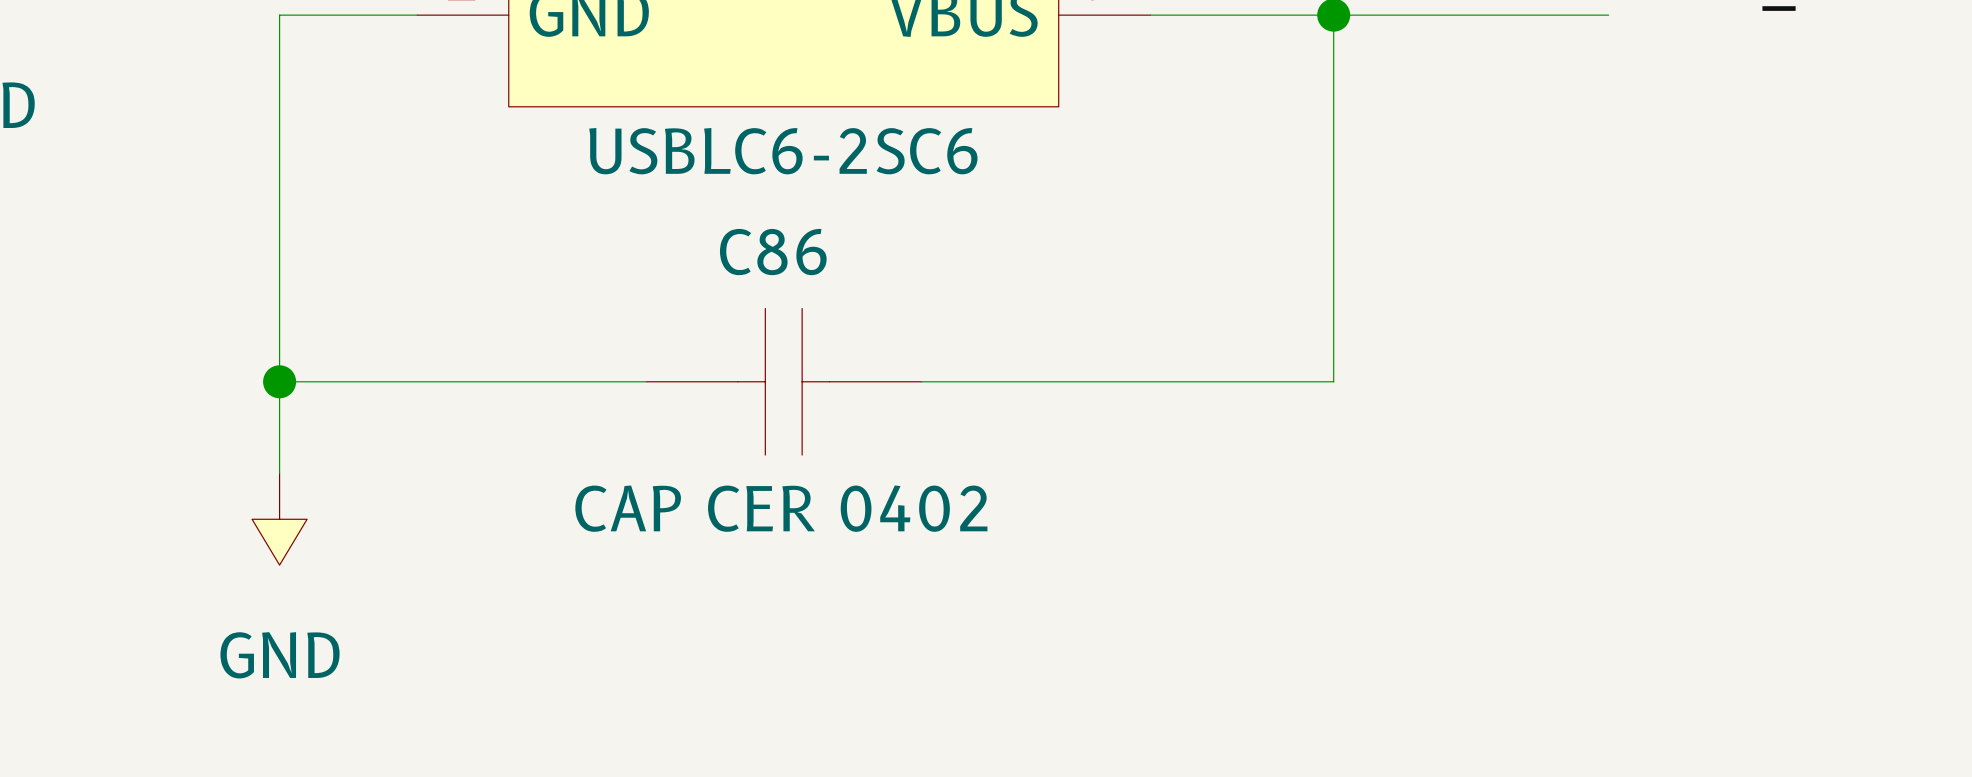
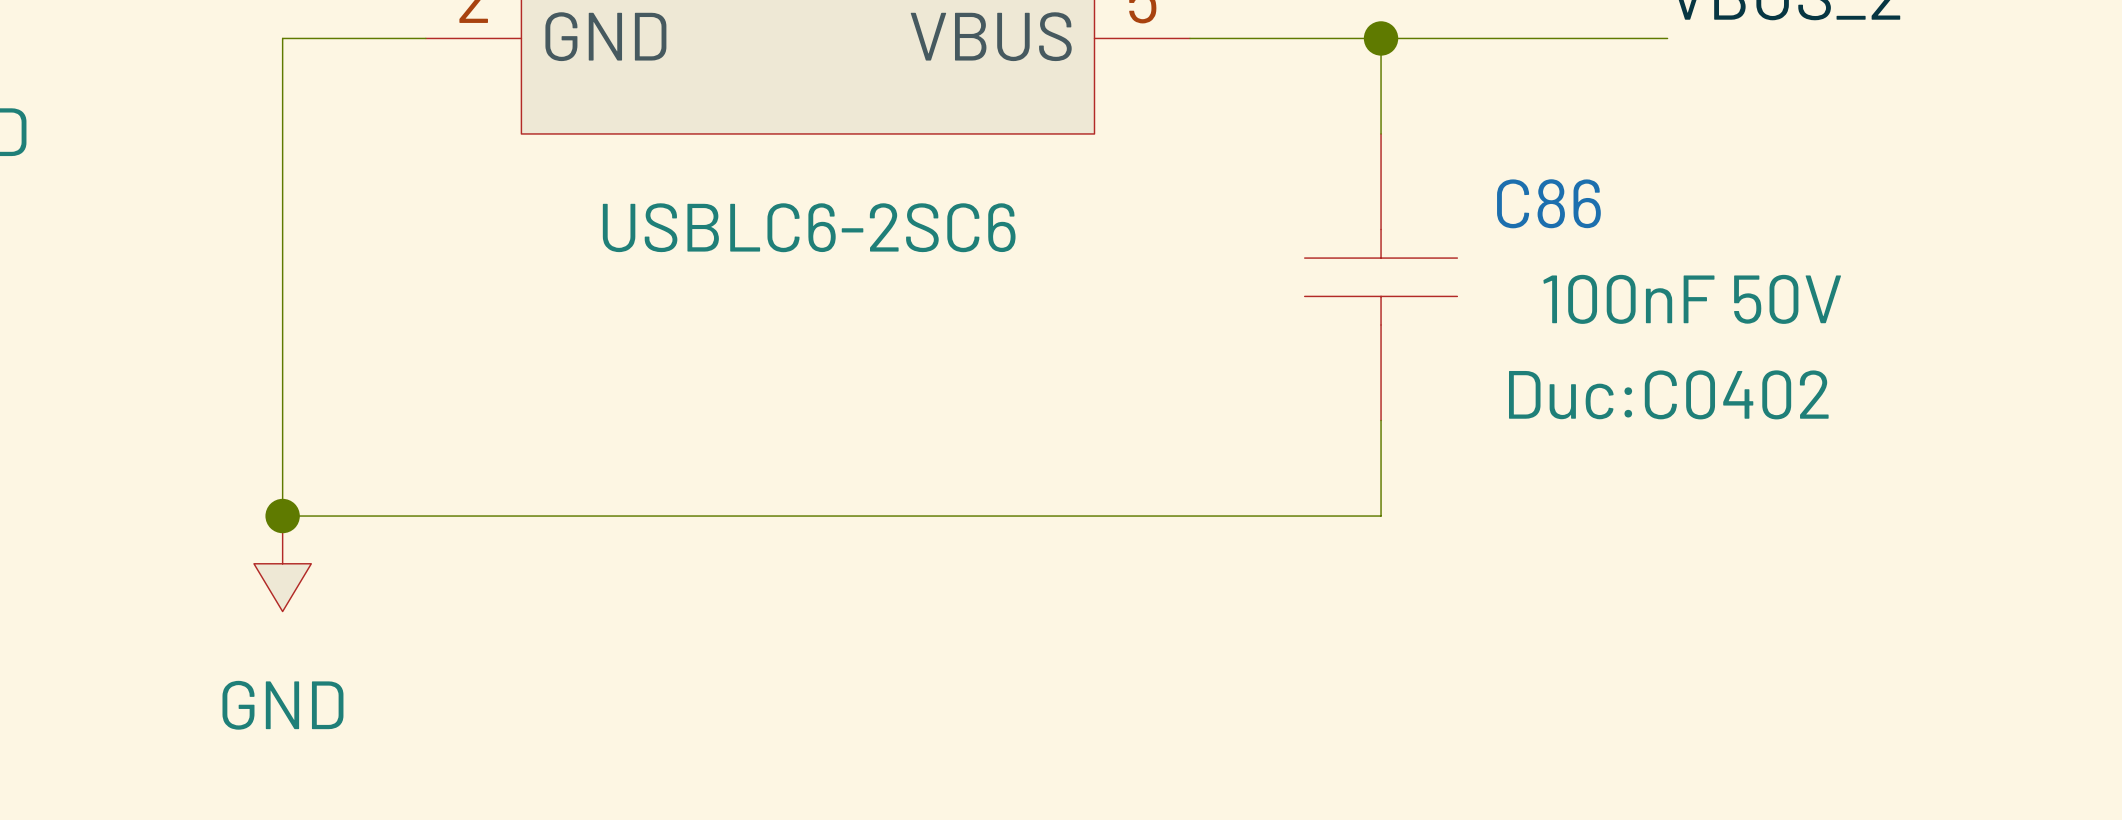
wire: (1333, 106) (1333, 381) (921, 381) -> none
part value position: USBLC6-2SC6 (783, 151) -> USBLC6-2SC6 (809, 227)
C86 text: none -> Duc:C0402 (1668, 394)
wire: (279, 381) (646, 381) -> none
junction position: (279, 381) -> (282, 516)
C86 rotation: 0° (783, 381) -> 90° clockwise (1381, 277)
C86 position: (783, 381) -> (1381, 277)
wire: none -> (1381, 420) (1381, 516) (282, 516)
C86 value: CAP CER 0402 (781, 508) -> 100nF 50V (1692, 299)

